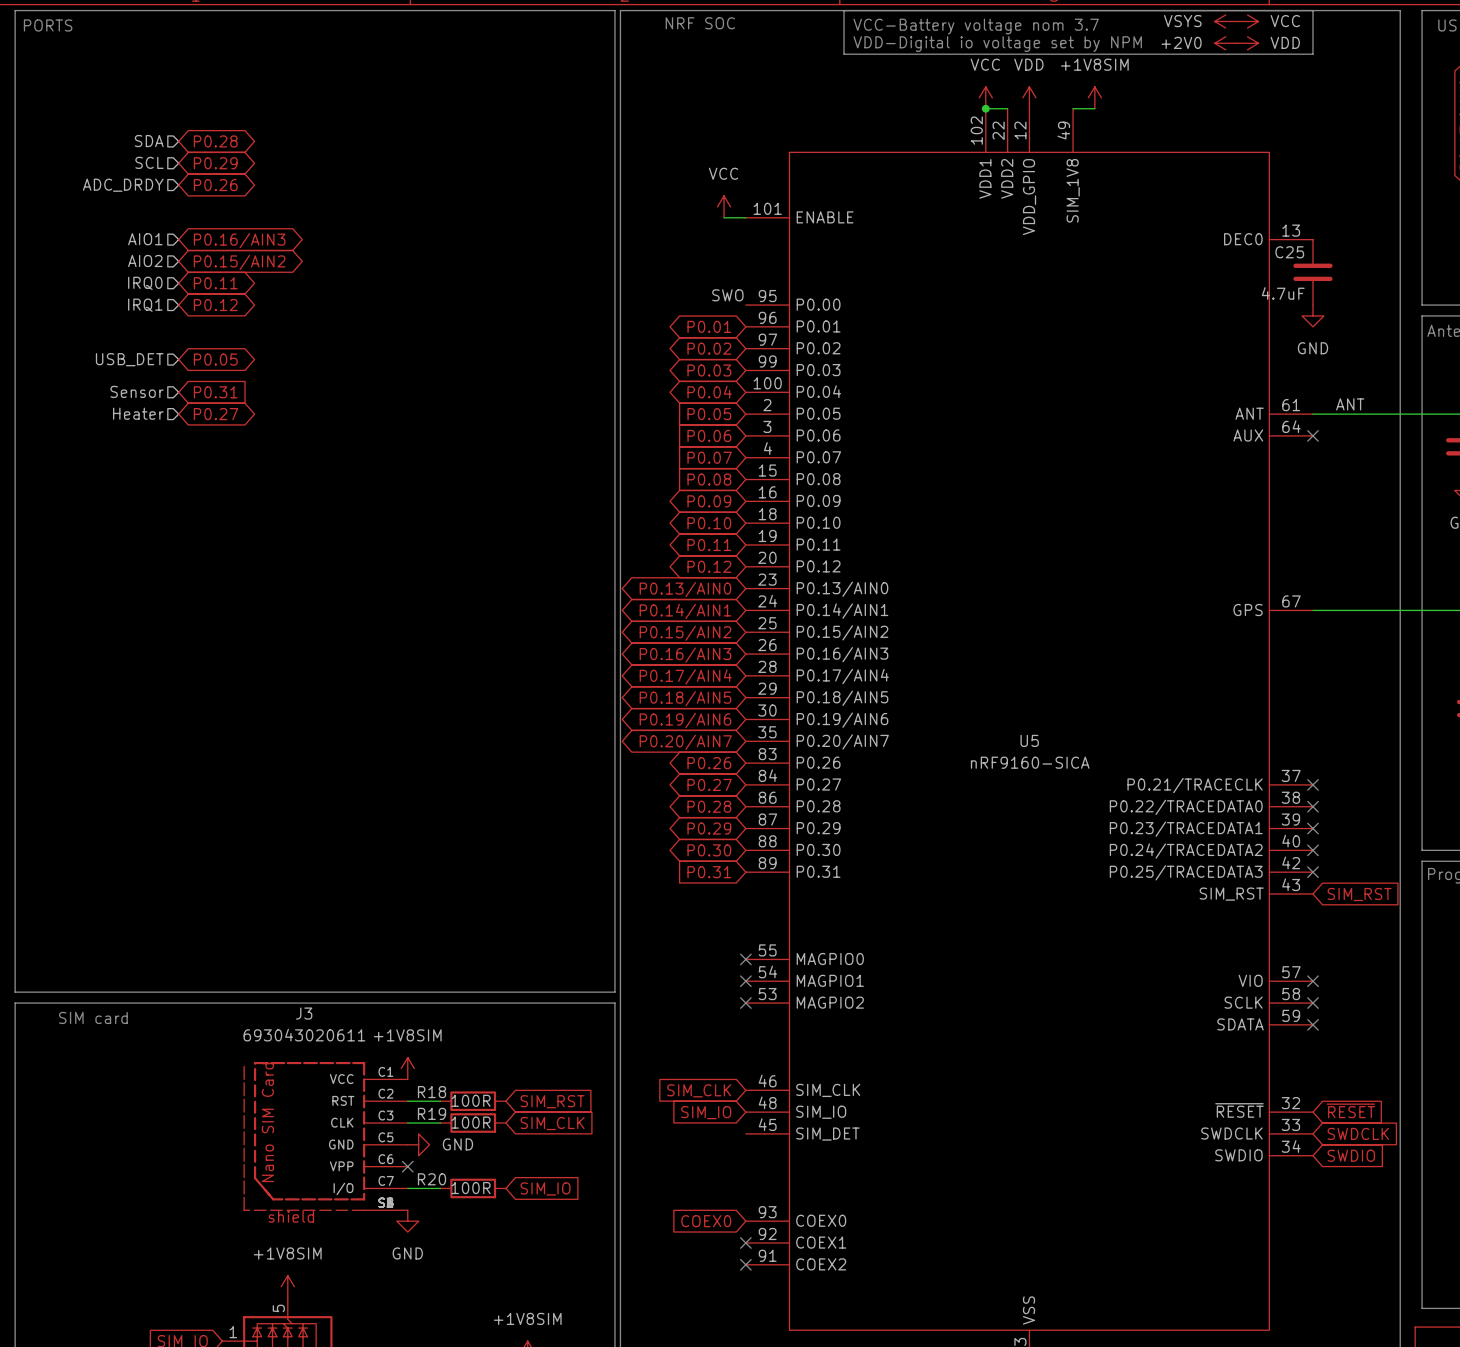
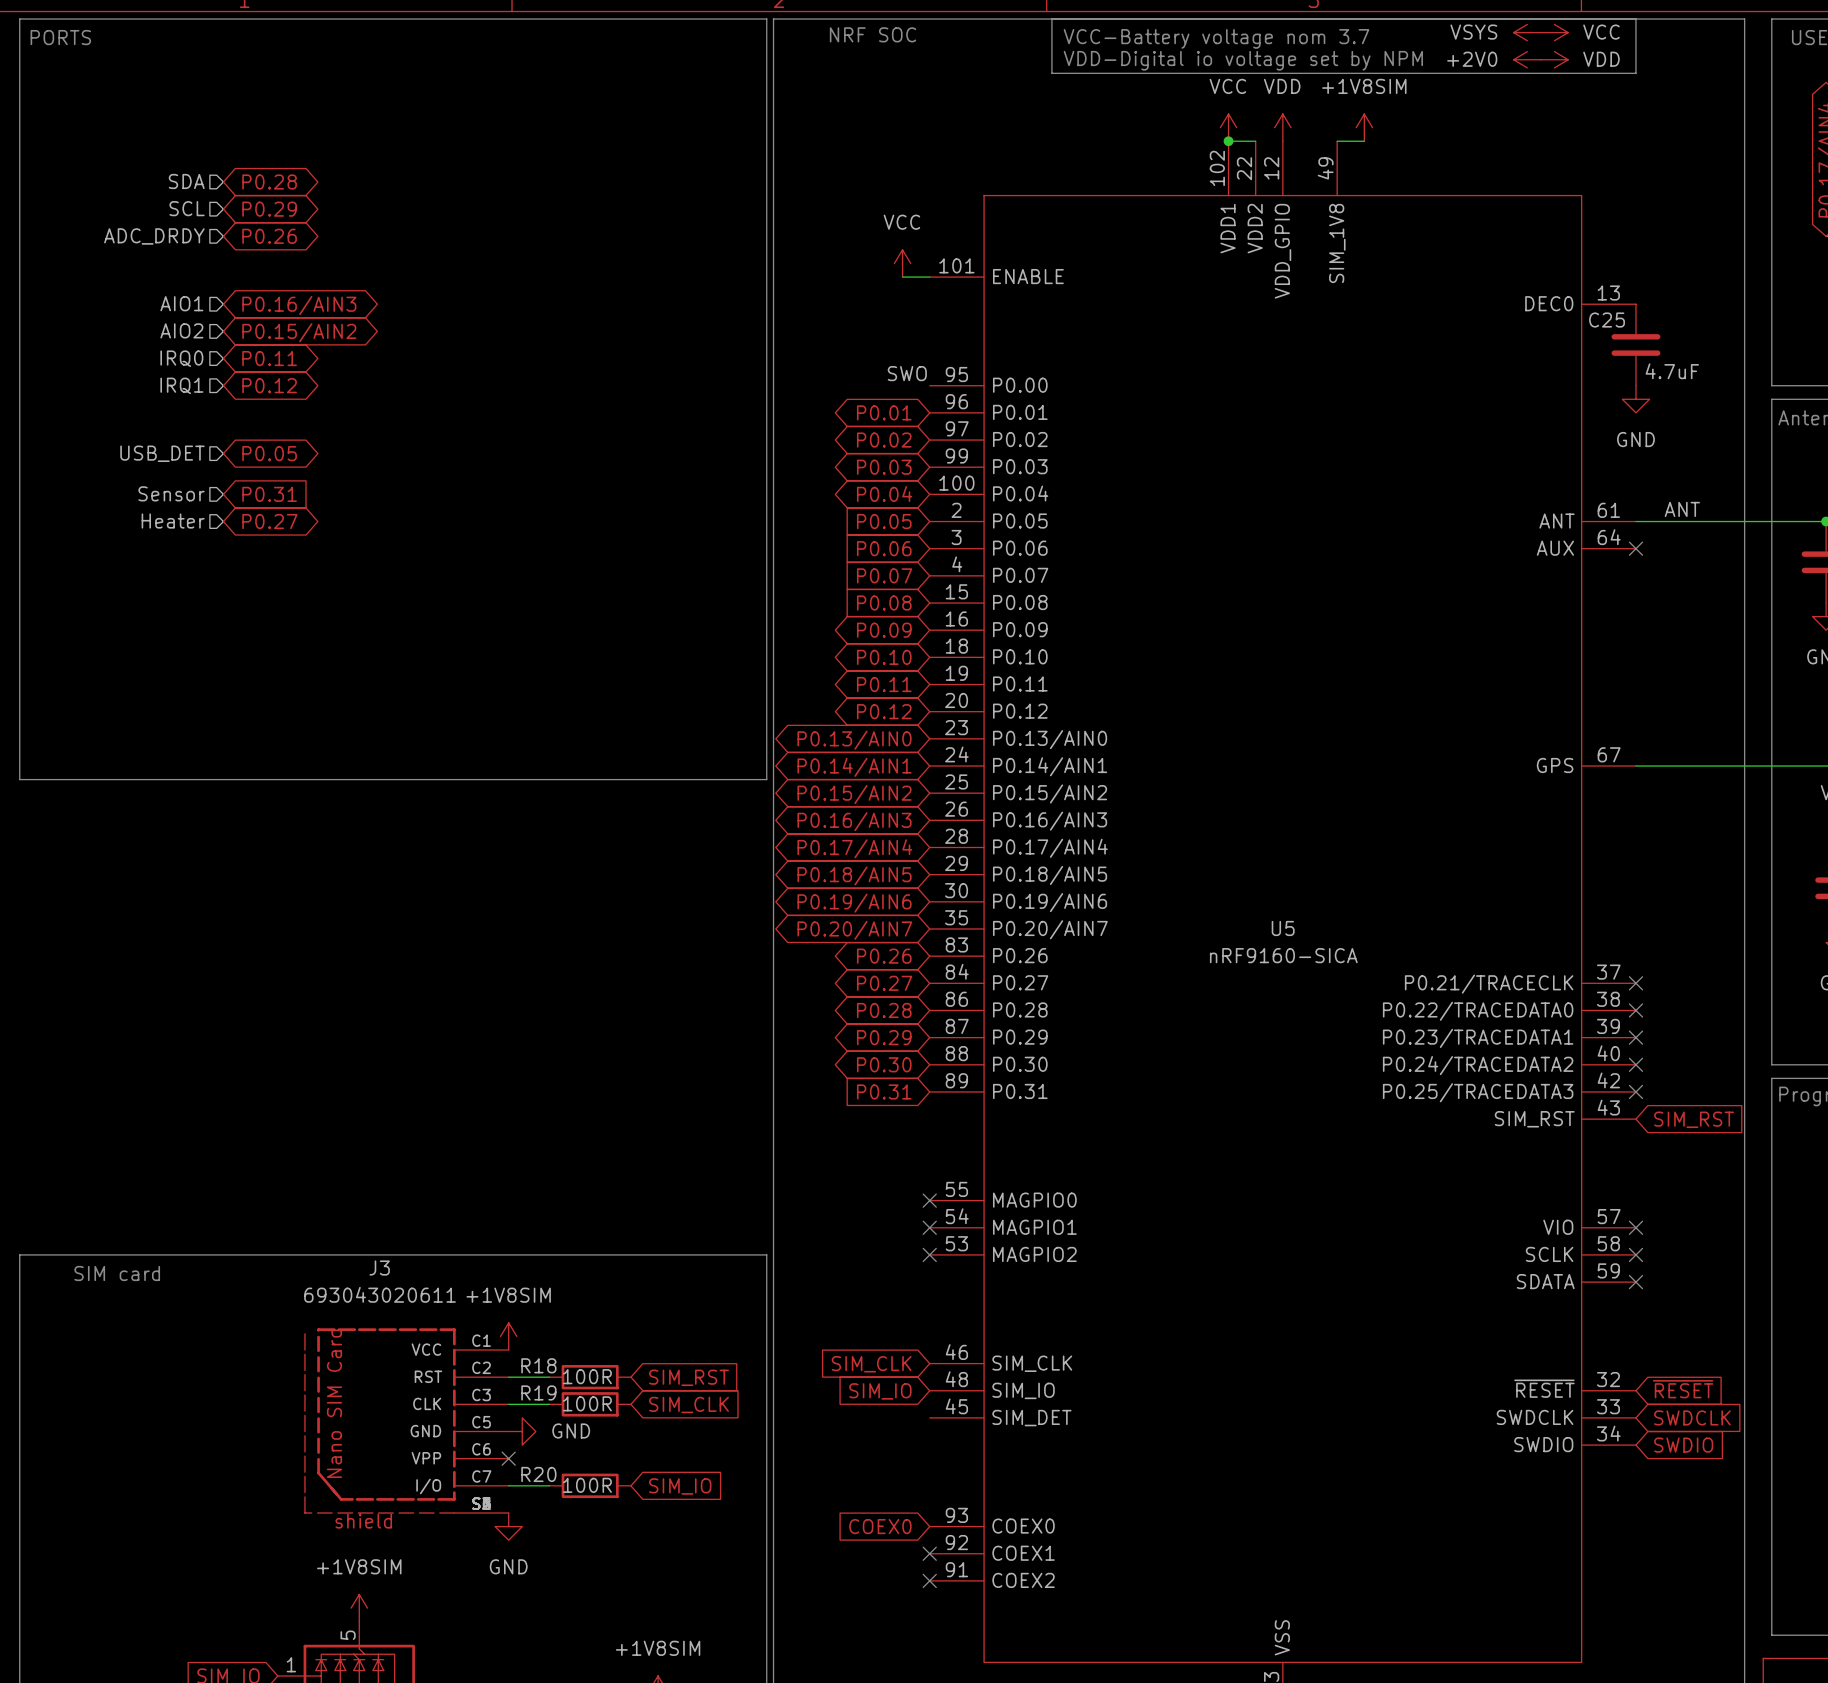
C25 value position: 4.7uF (1283, 293) -> 4.7uF (1672, 371)
line: (15, 621) (15, 992) (614, 992) (614, 621) -> (19, 779) (766, 779)

